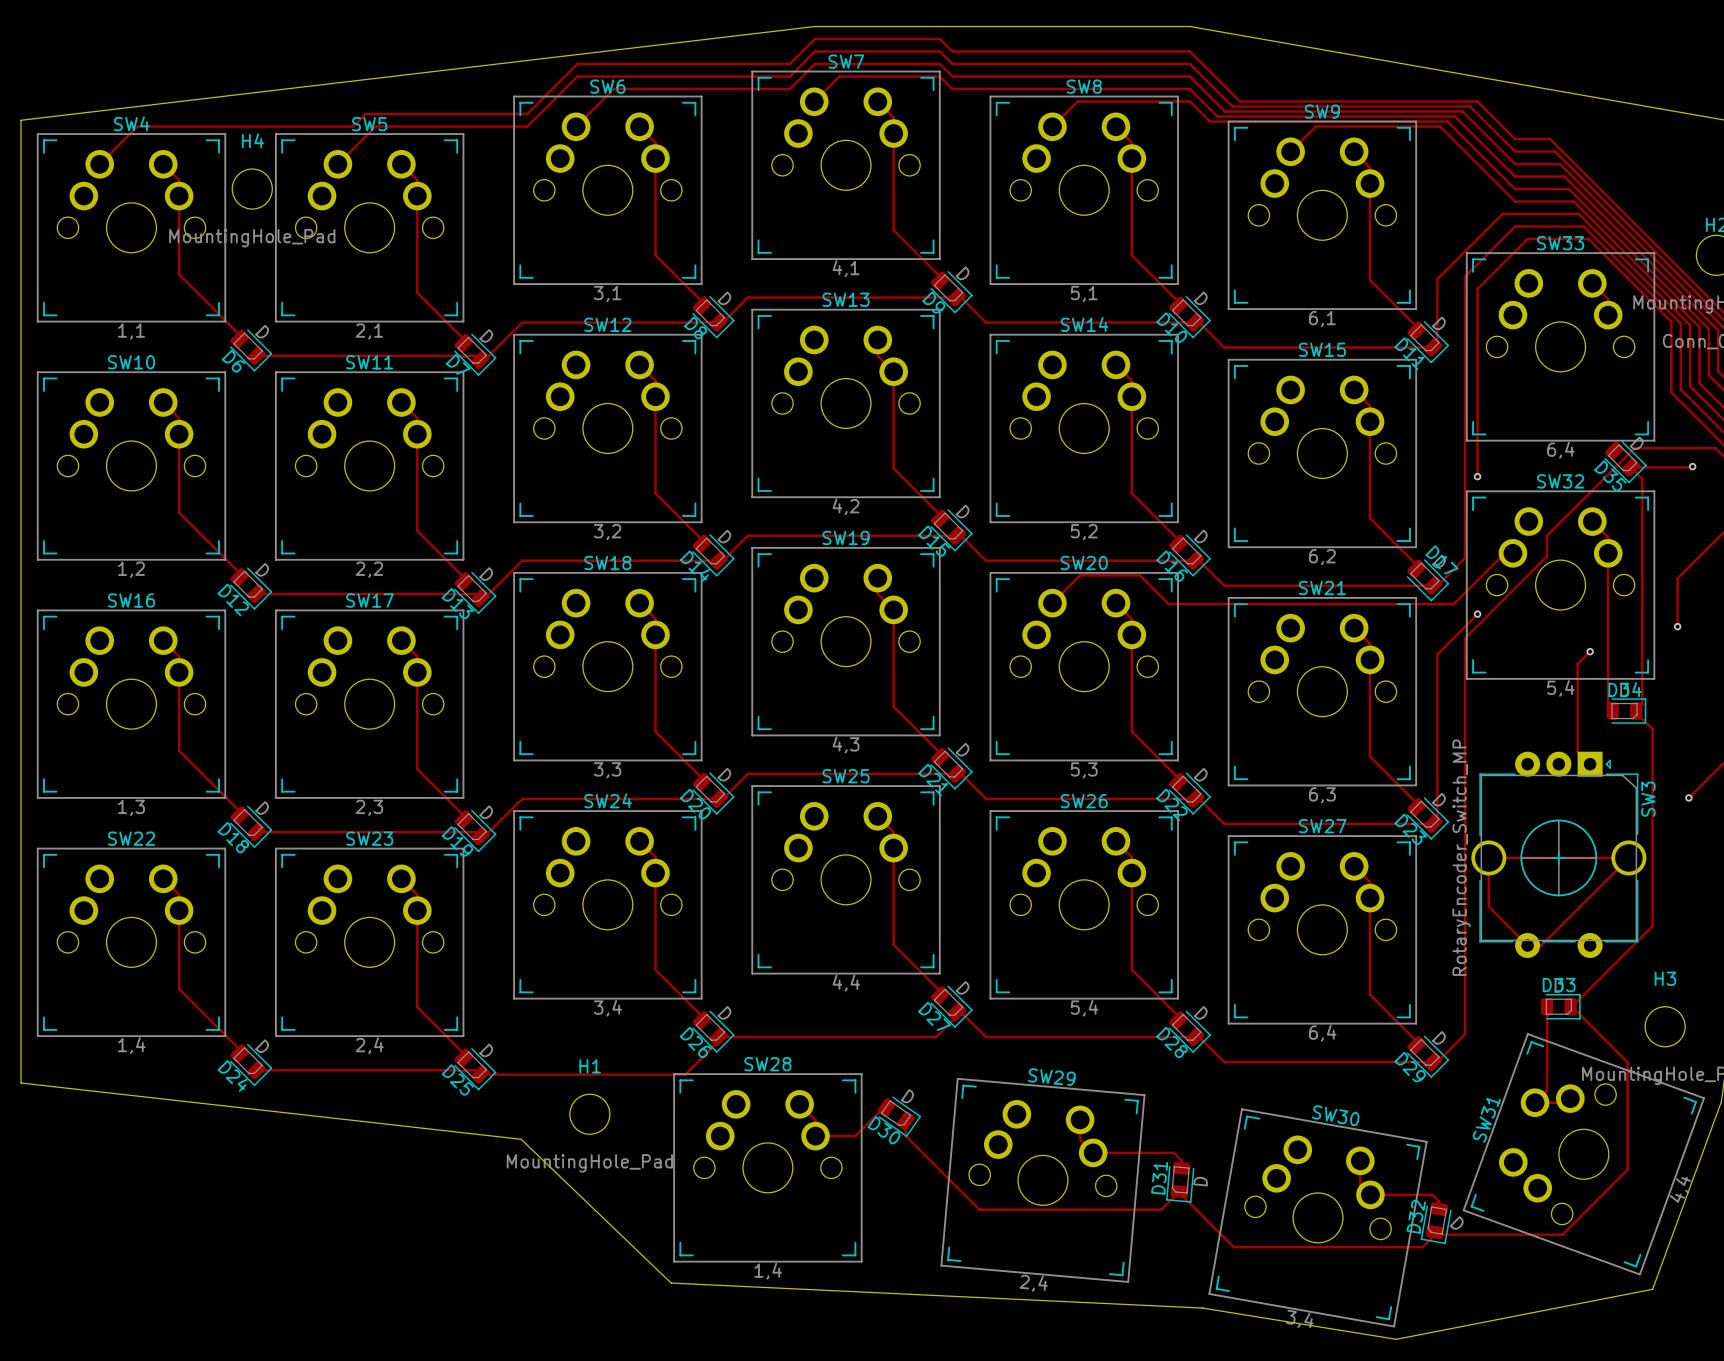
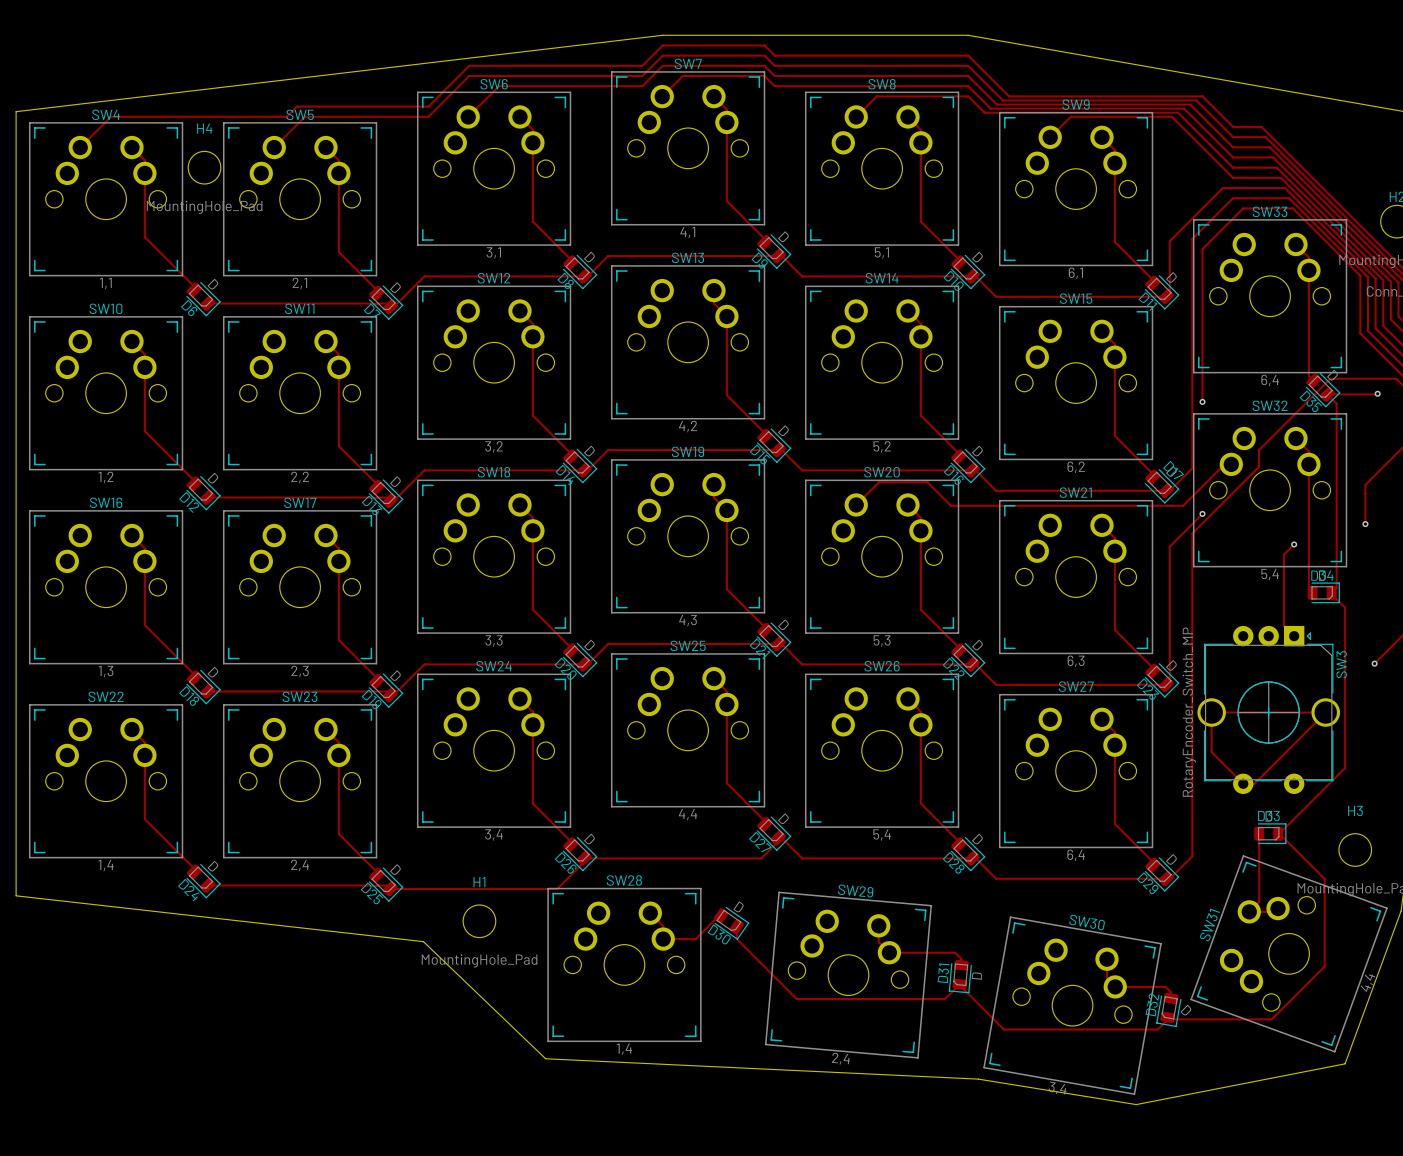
track: none -> (1308, 270) (1308, 375) (1313, 380)

